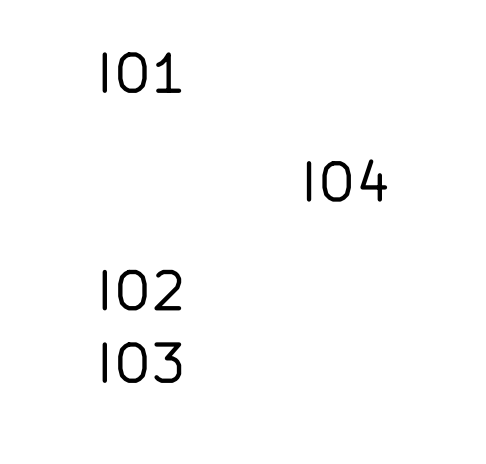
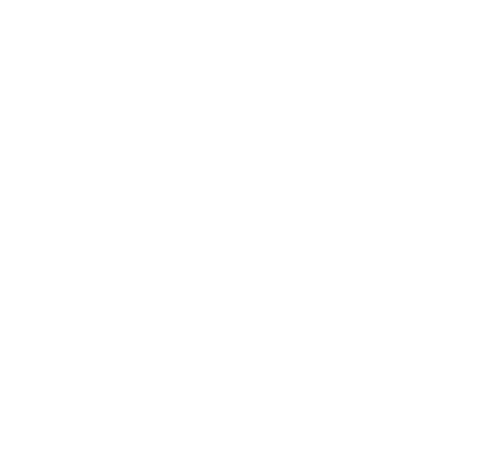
label: IO1 (141, 72) -> none
label: IO4 (347, 180) -> none
label: IO2 (141, 290) -> none
label: IO3 (141, 362) -> none

